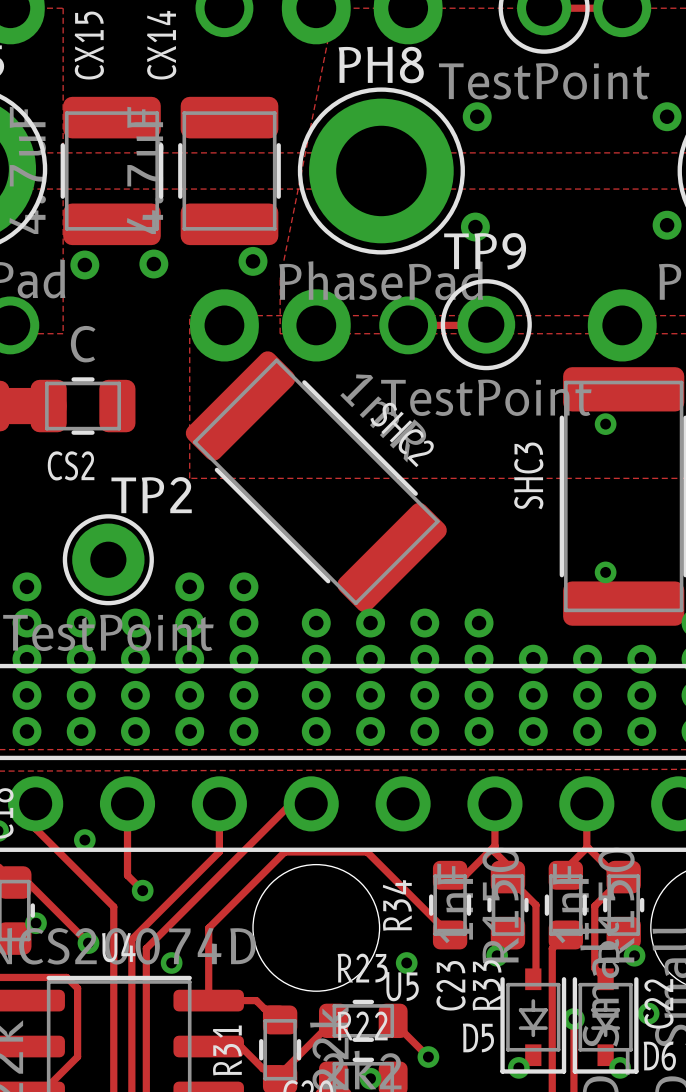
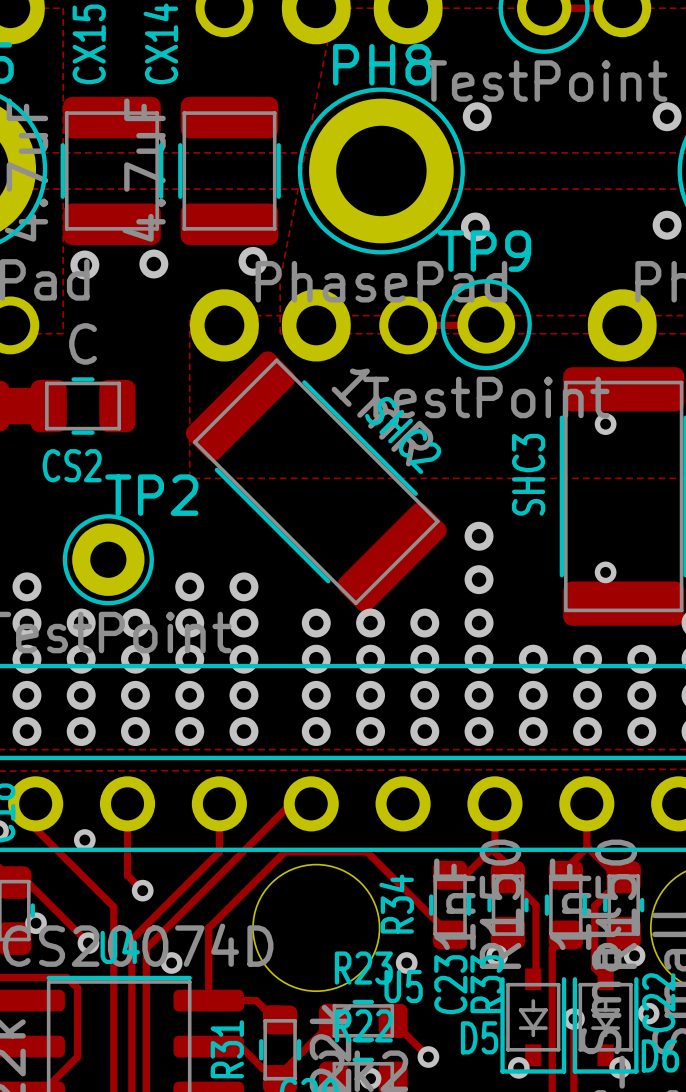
via: none -> (479, 536)
via: none -> (479, 579)

